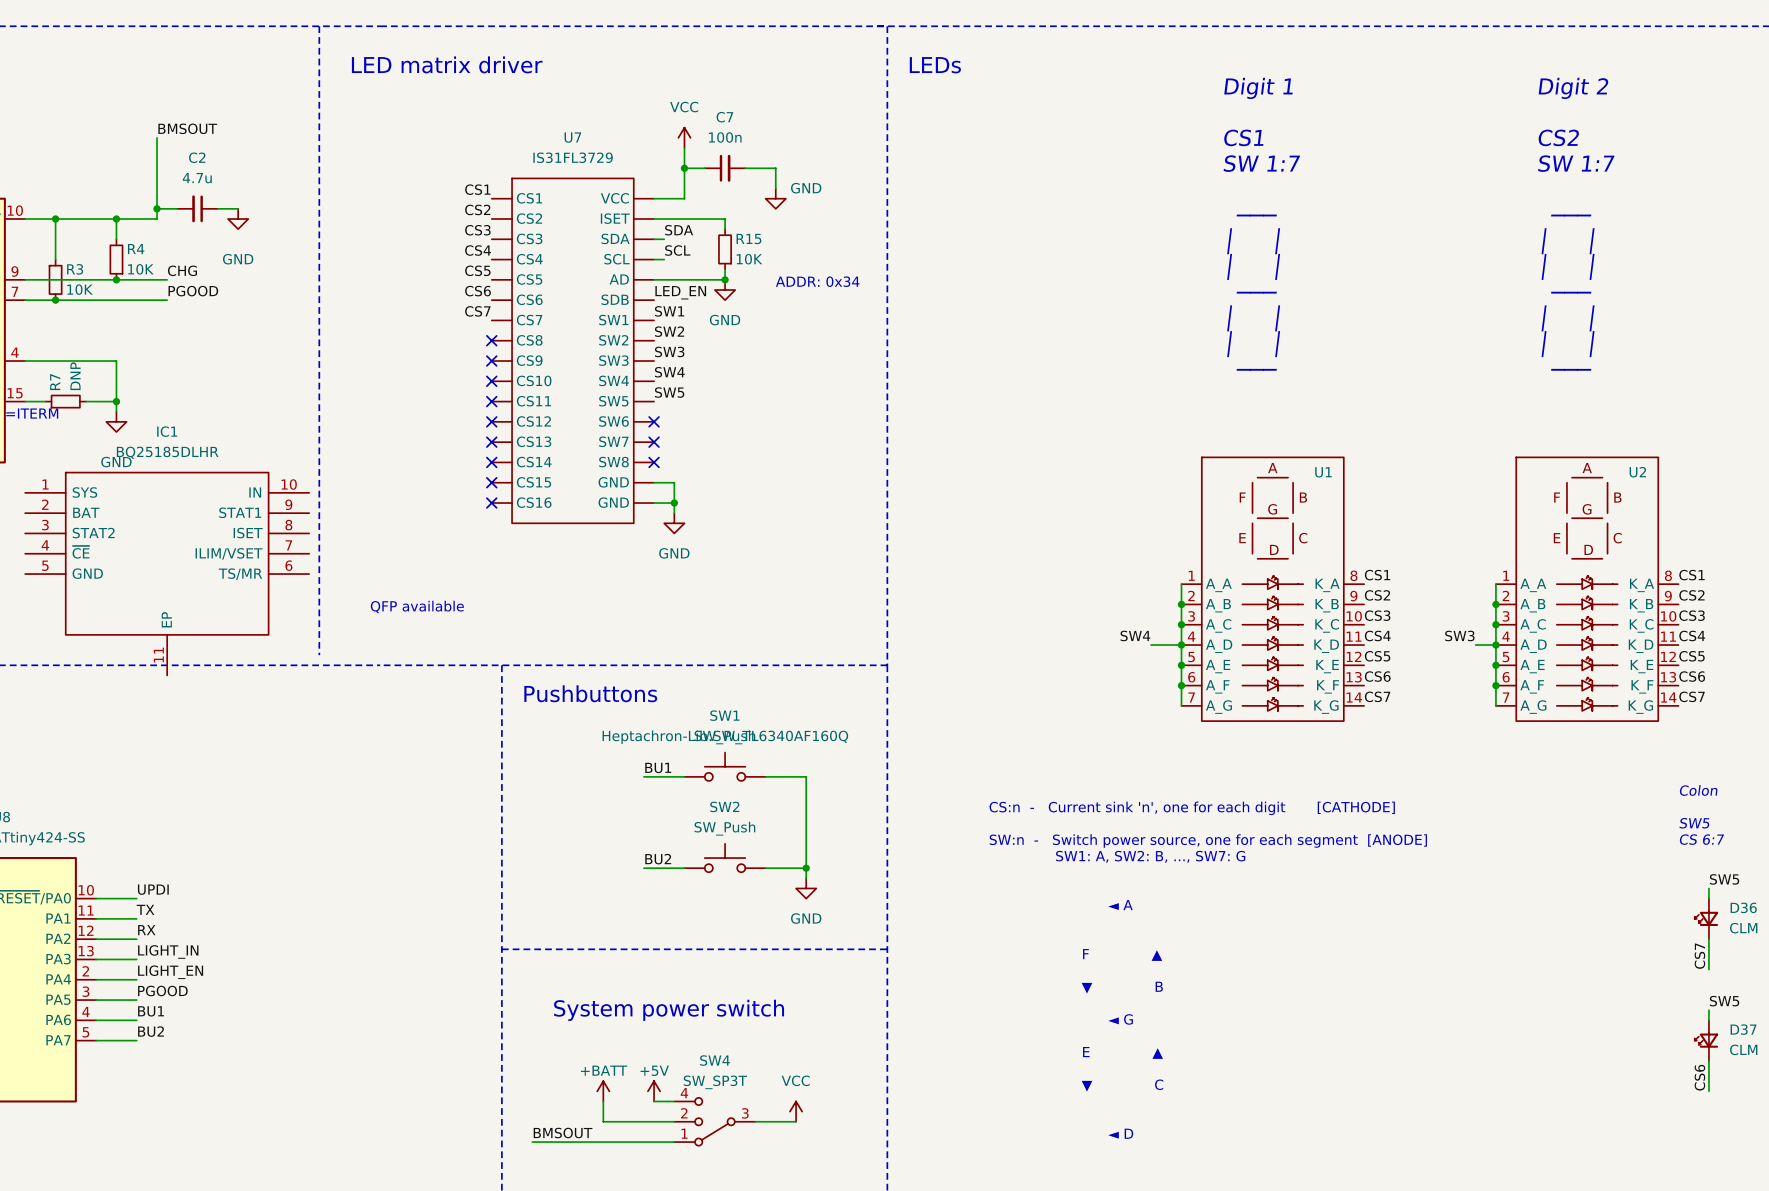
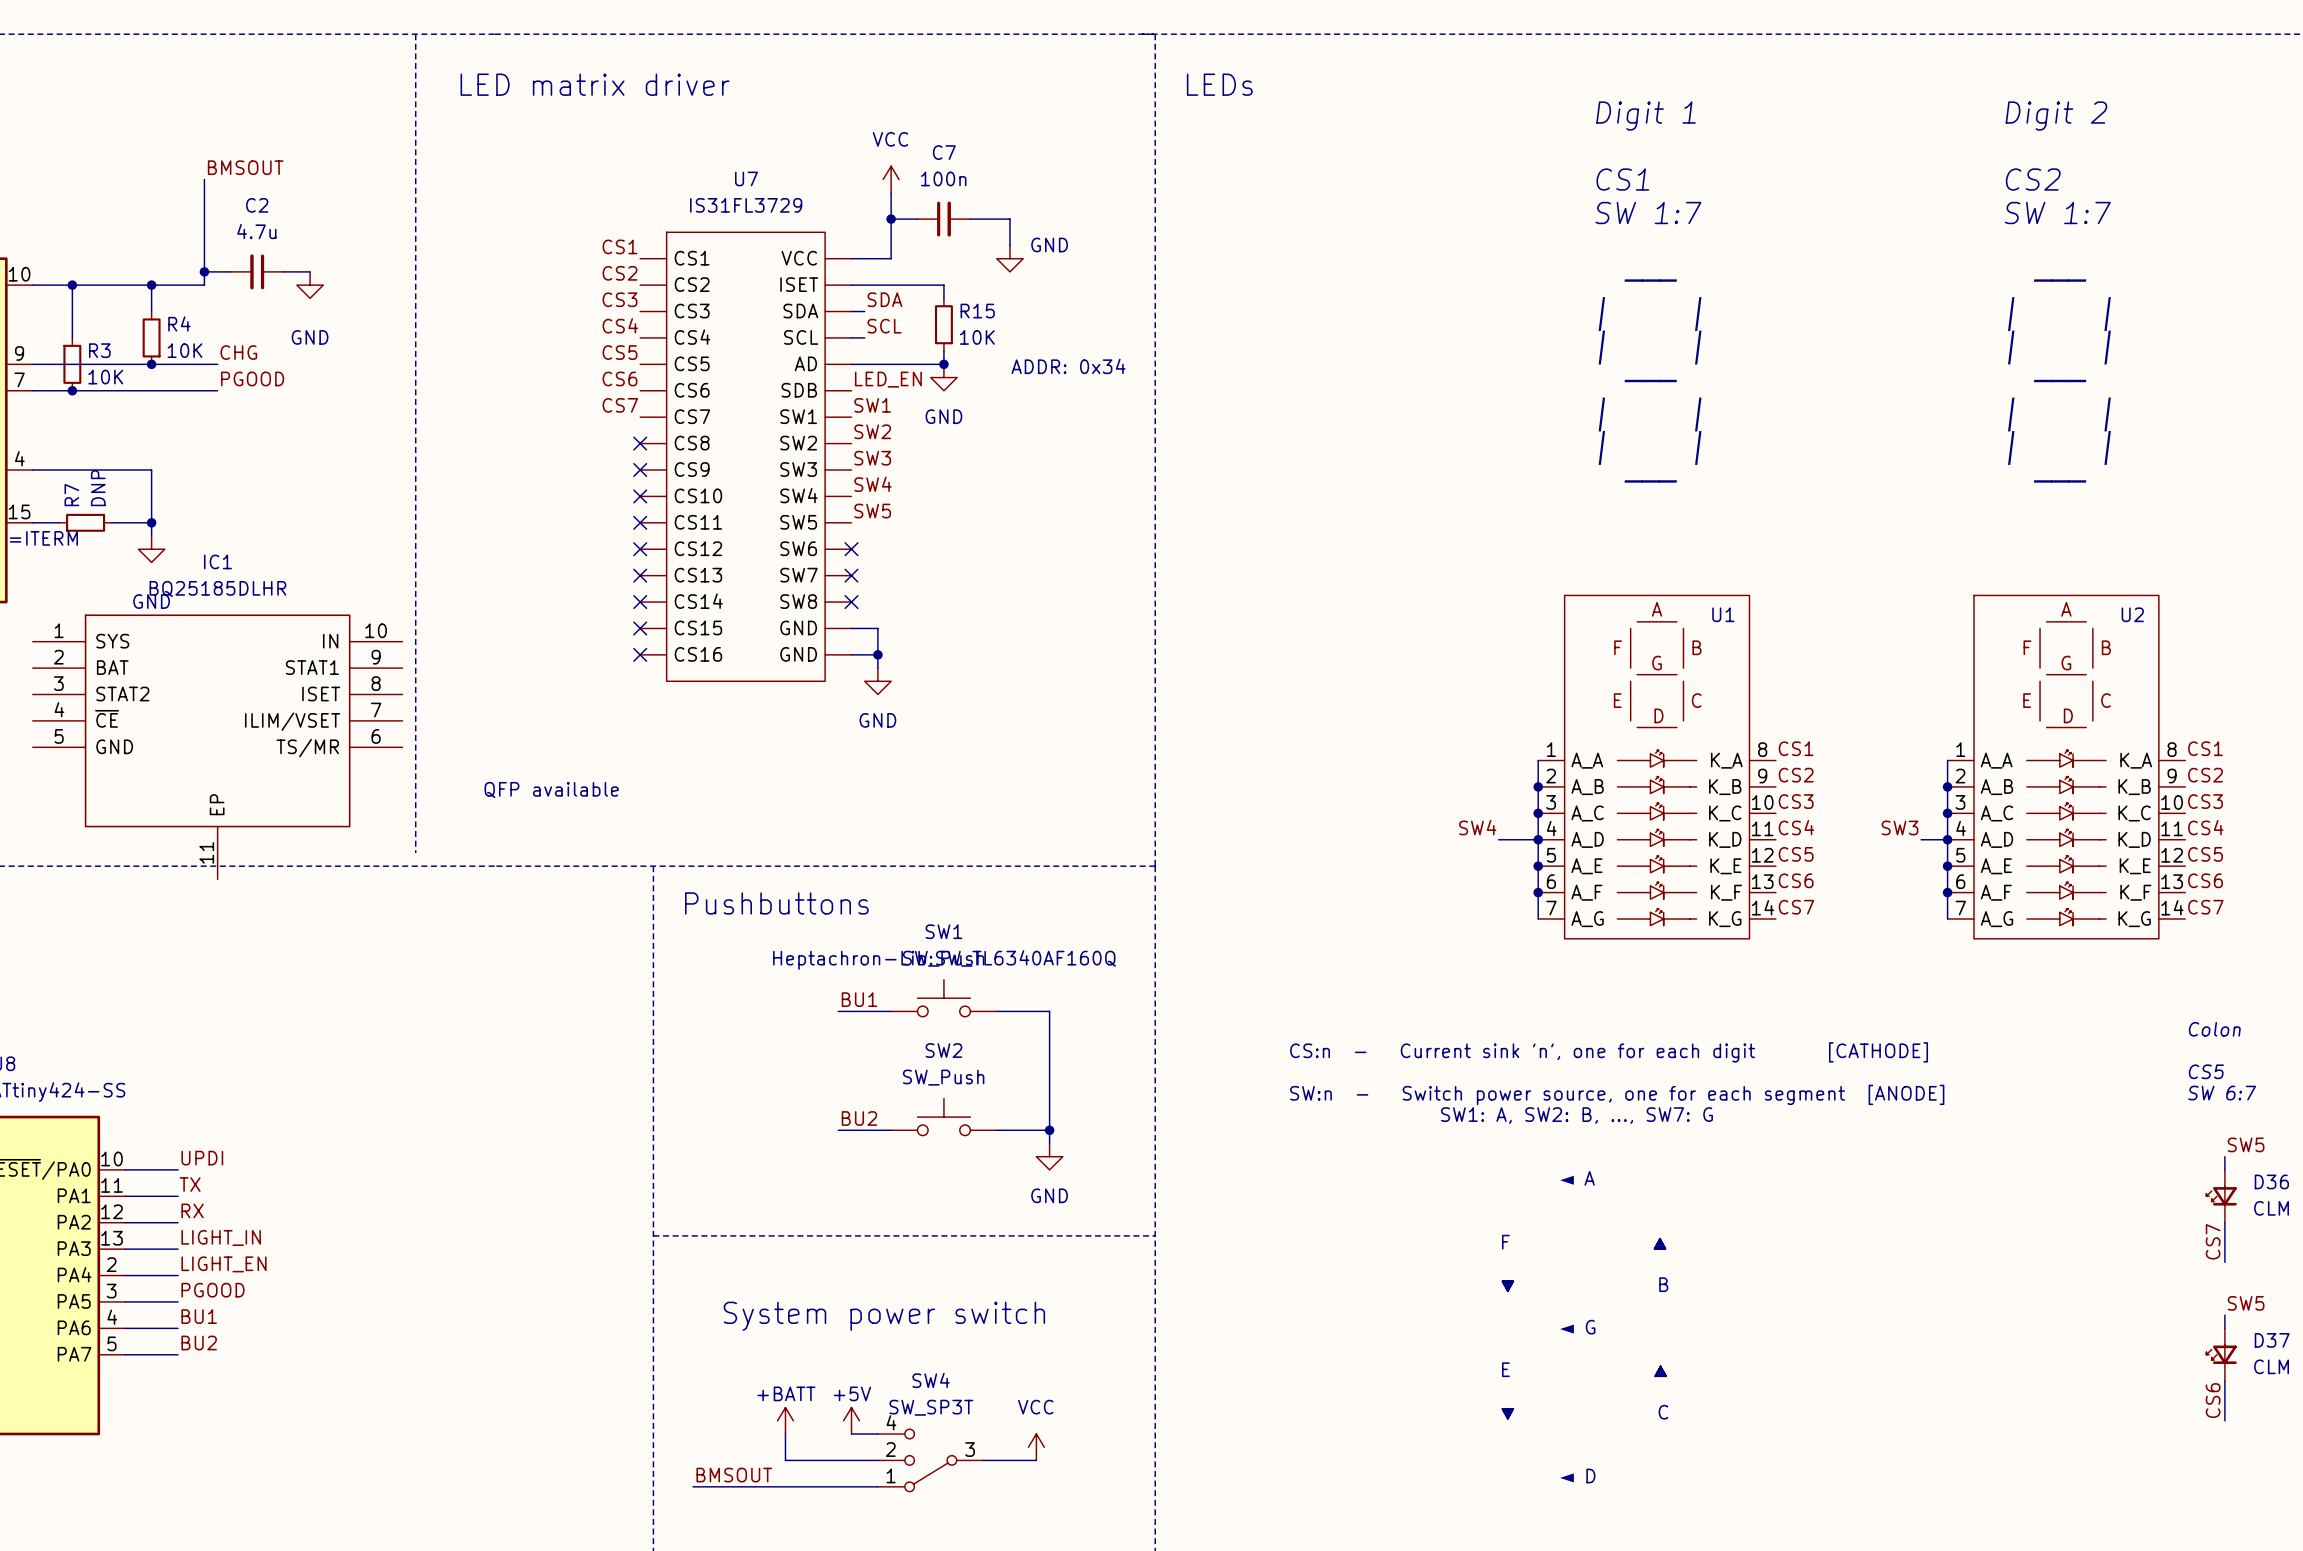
text: SW5 (1694, 823) -> CS5 (2206, 1071)
text: CS 6:7 (1701, 839) -> SW 6:7 (2222, 1093)

